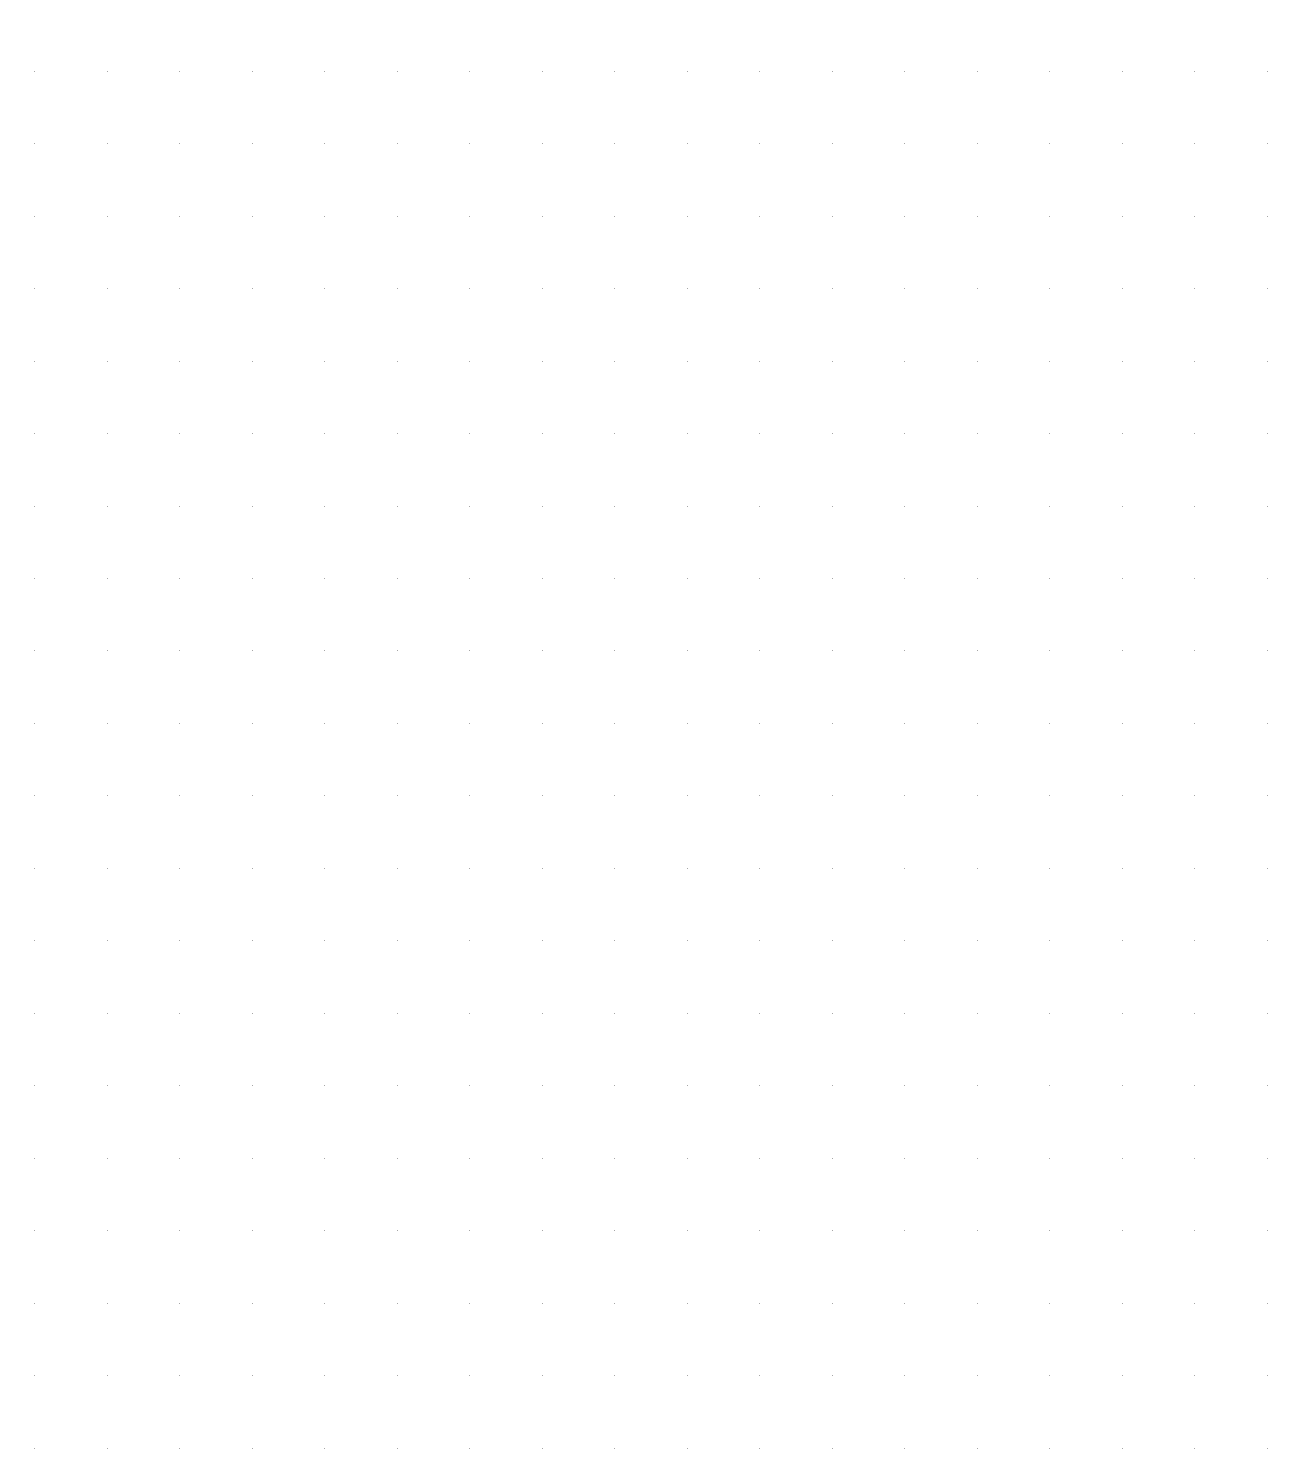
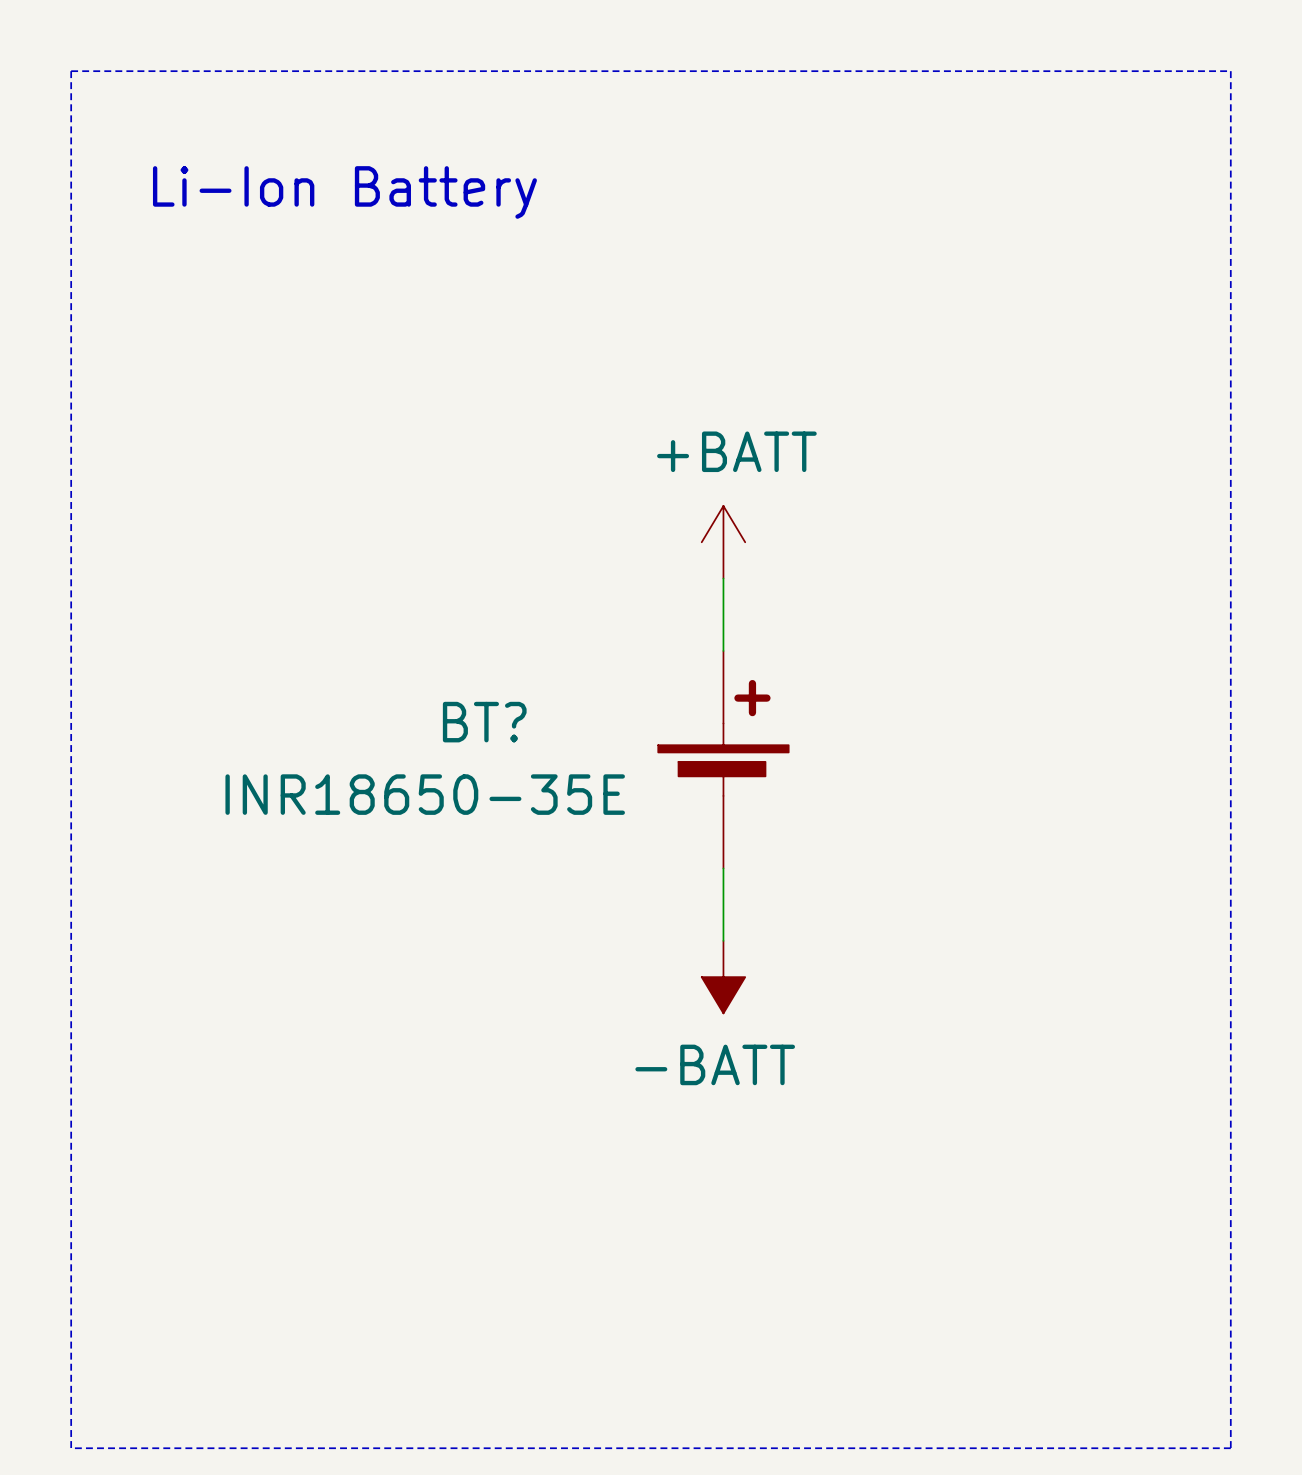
line: none -> (71, 71) (1230, 71) (1230, 1448) (71, 1448) (71, 71)
text: none -> Li-Ion Battery (344, 192)
power symbol: none -> +BATT (723, 542)
wire: none -> (723, 578) (723, 650)
BT?: none -> INR18650-35E (723, 759)
wire: none -> (723, 868) (723, 940)
power symbol: none -> -BATT (723, 977)

